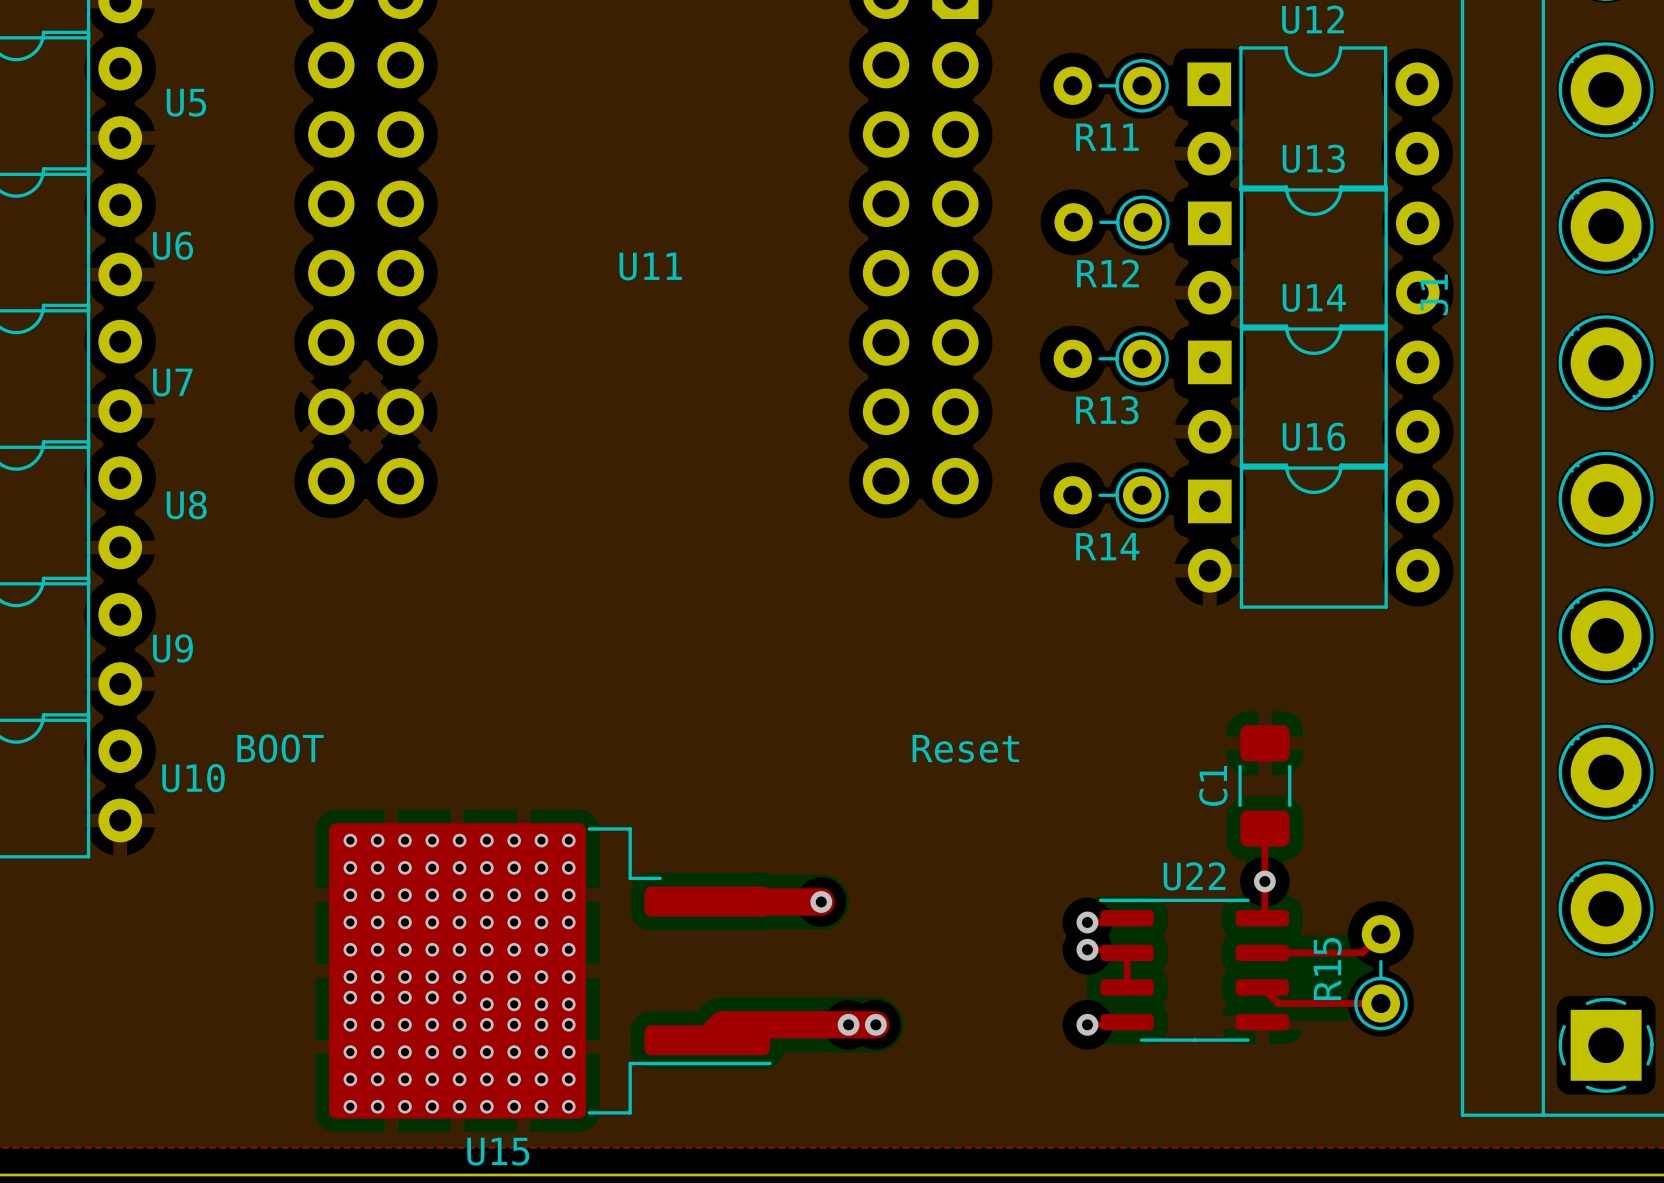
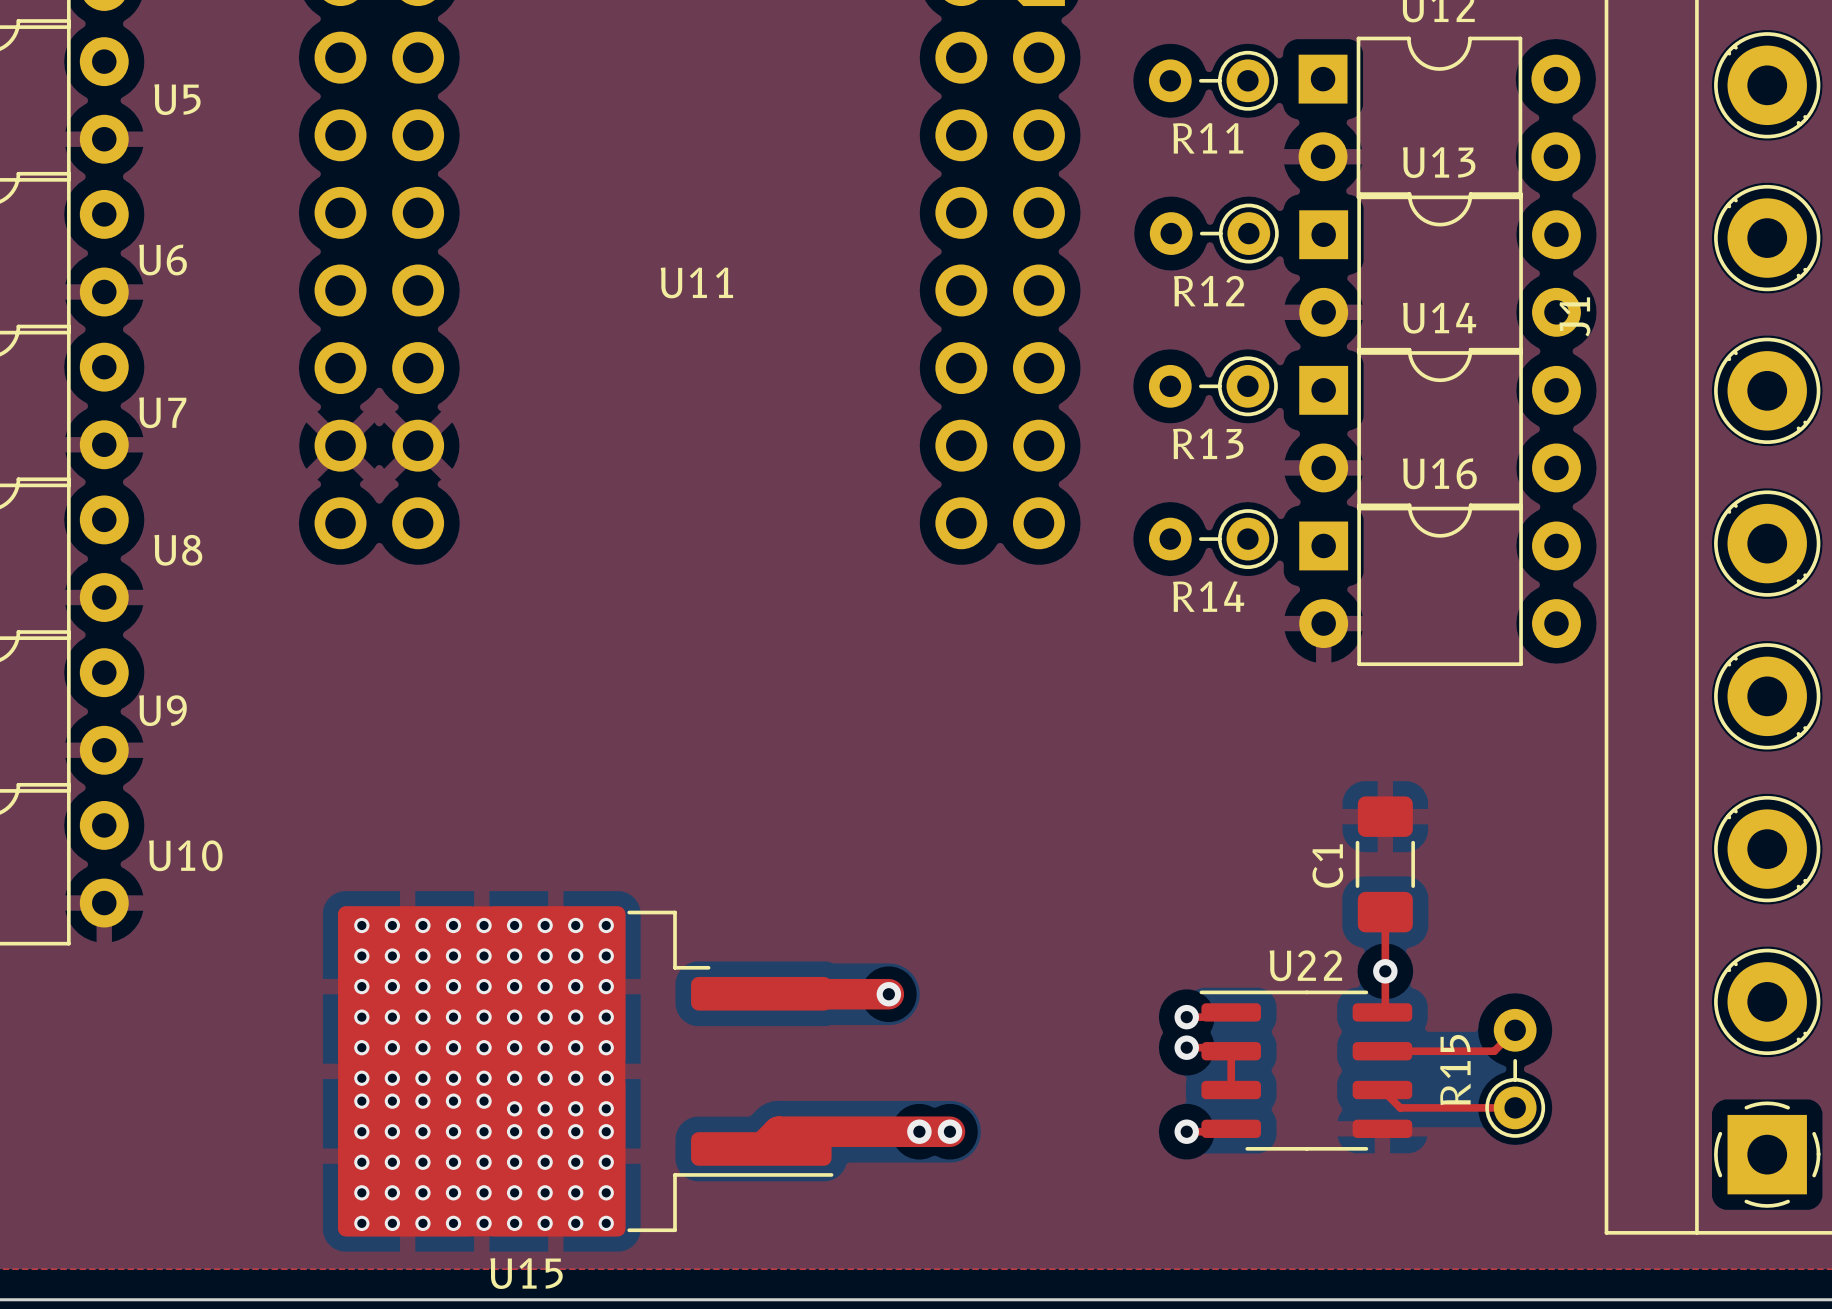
text: BOOT (280, 748) -> none
text: Reset (965, 748) -> none

